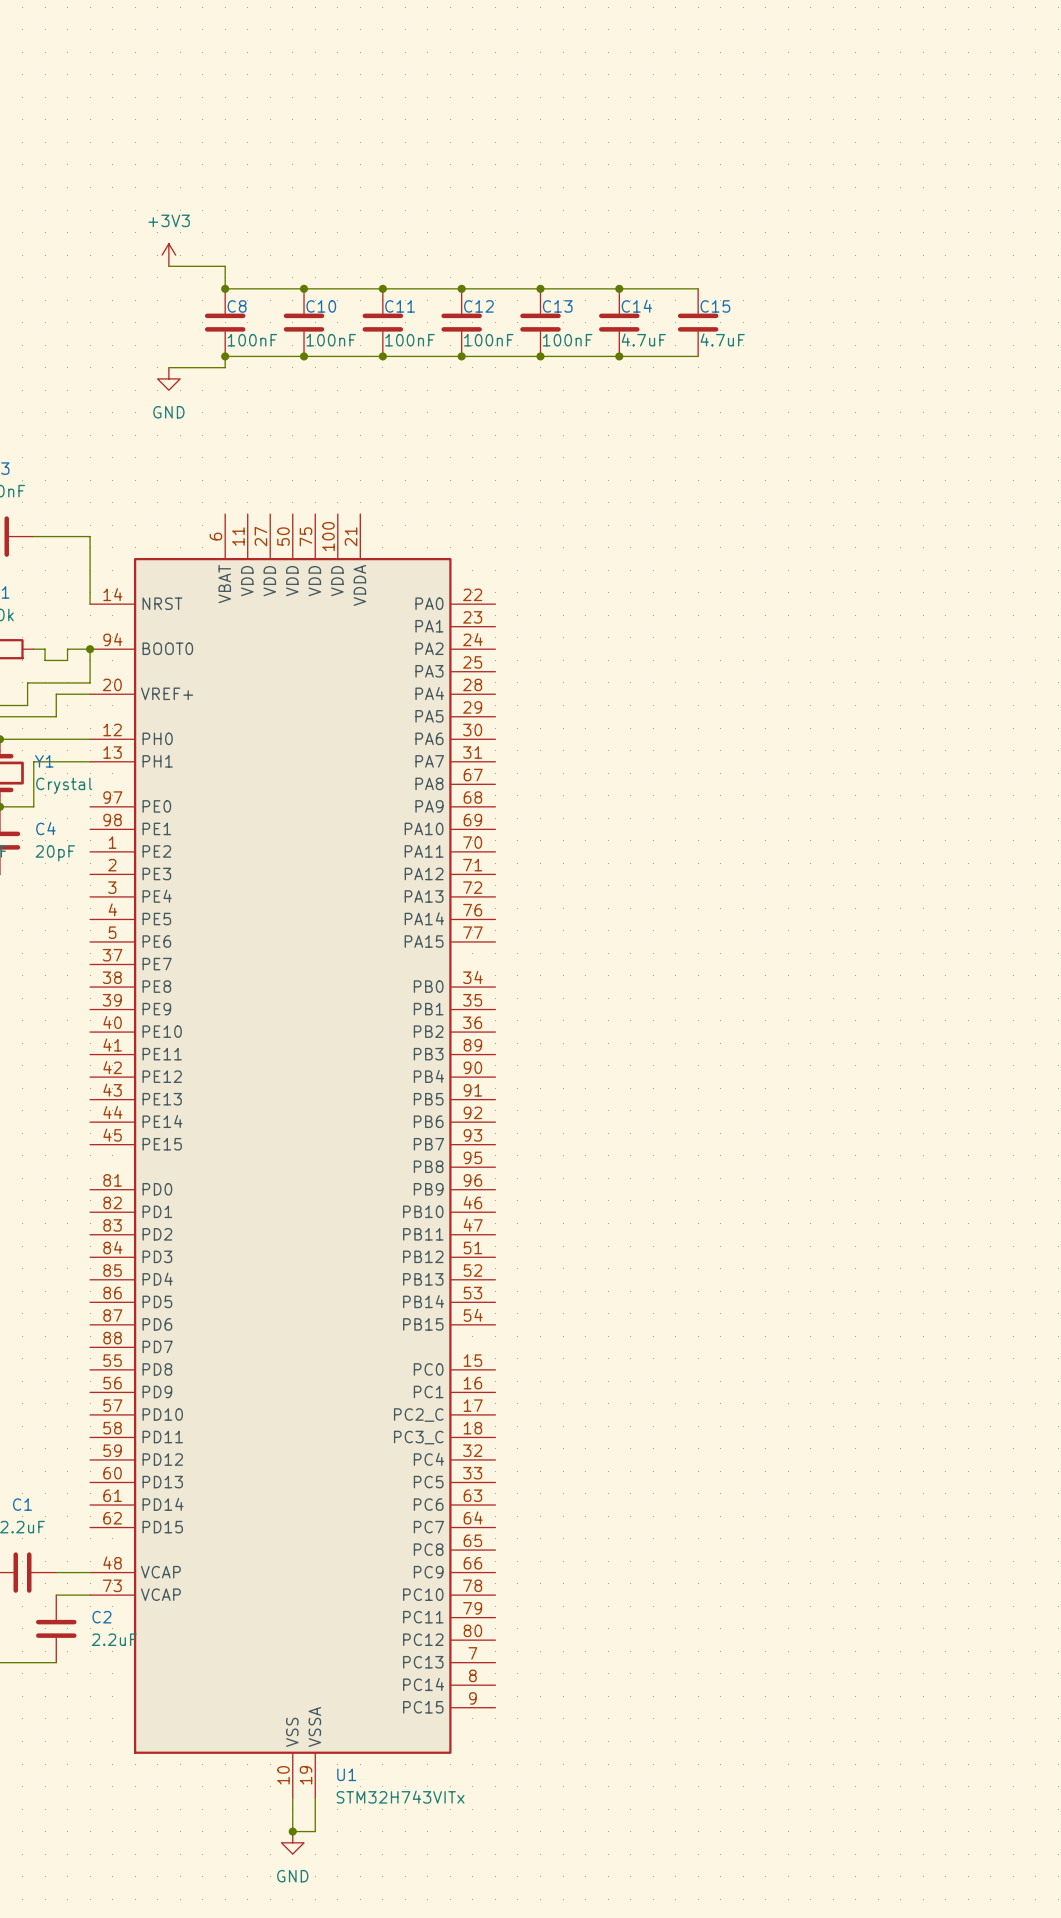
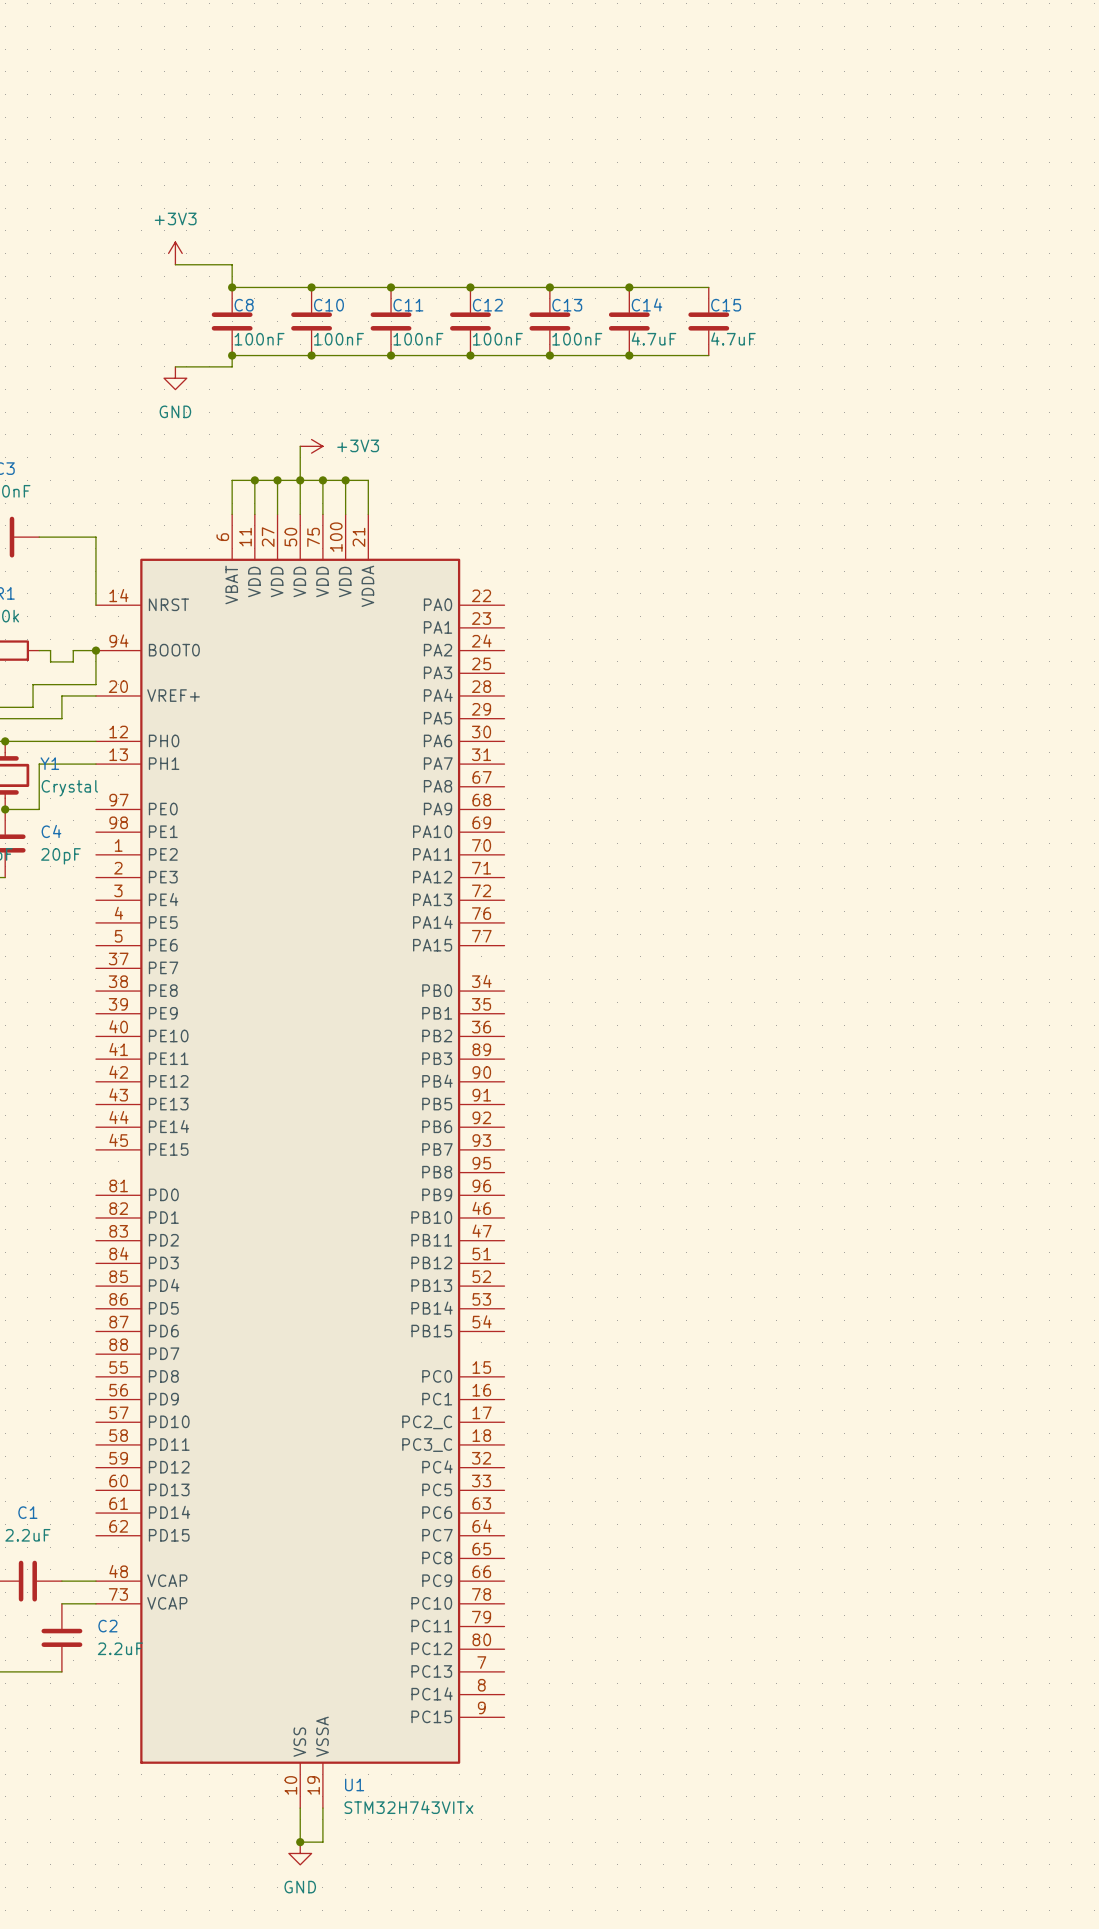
wire: none -> (300, 446) (300, 514)
power symbol: none -> +3V3 (311, 446)
wire: none -> (254, 480) (254, 514)
junction: none -> (254, 480)
wire: none -> (277, 480) (277, 514)
junction: none -> (277, 480)
junction: none -> (300, 480)
wire: none -> (322, 480) (322, 514)
junction: none -> (322, 480)
wire: none -> (345, 480) (345, 514)
junction: none -> (345, 480)
wire: none -> (232, 514) (232, 480) (368, 480) (368, 514)

